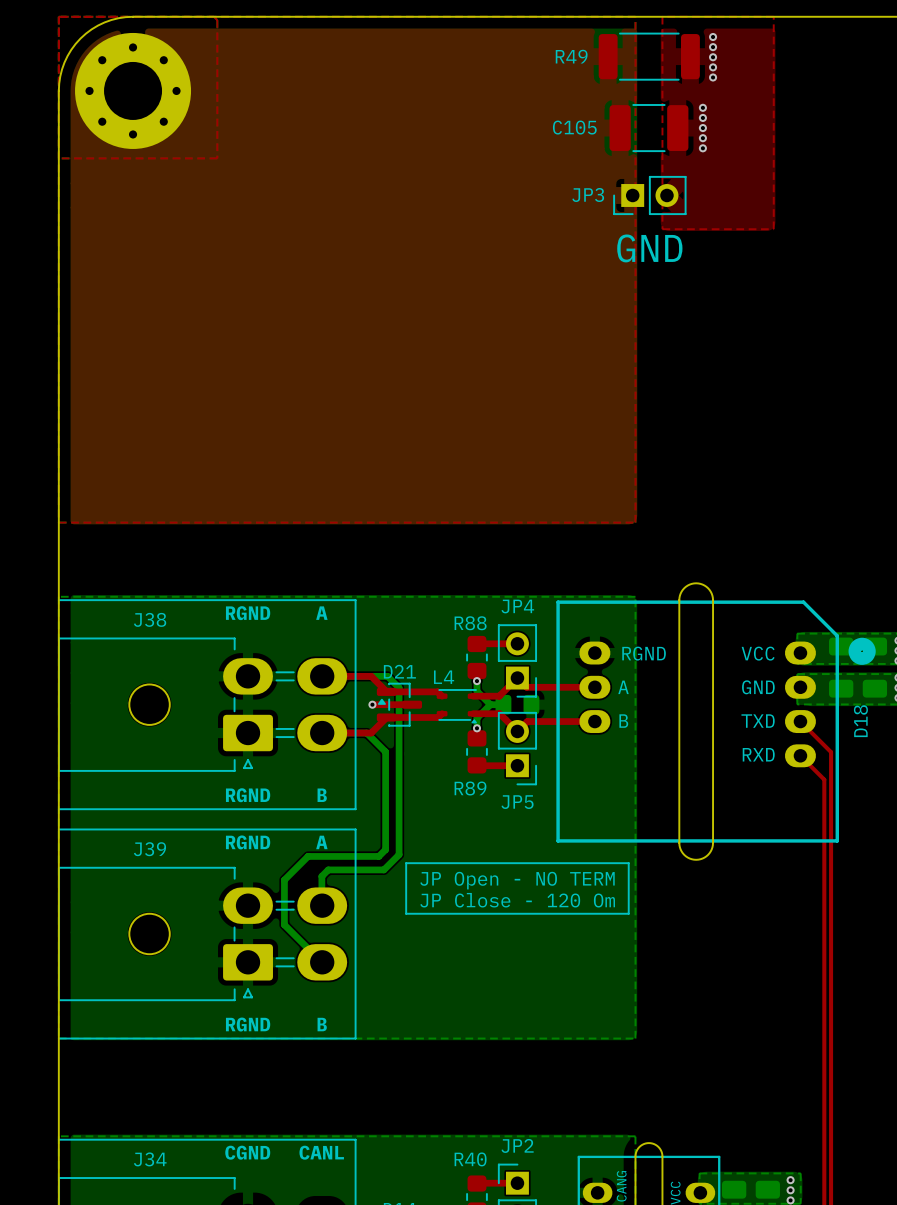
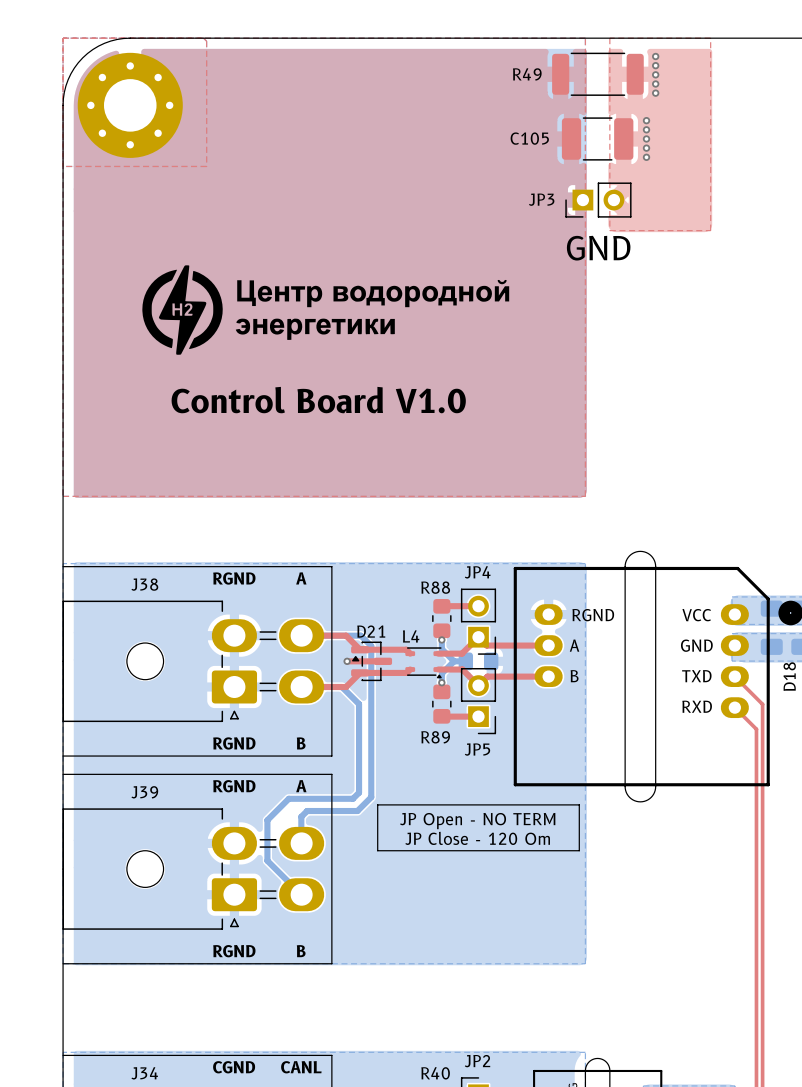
drawing: none -> [142, 265, 510, 355]
text: none -> Control Board V1.0 (318, 400)

